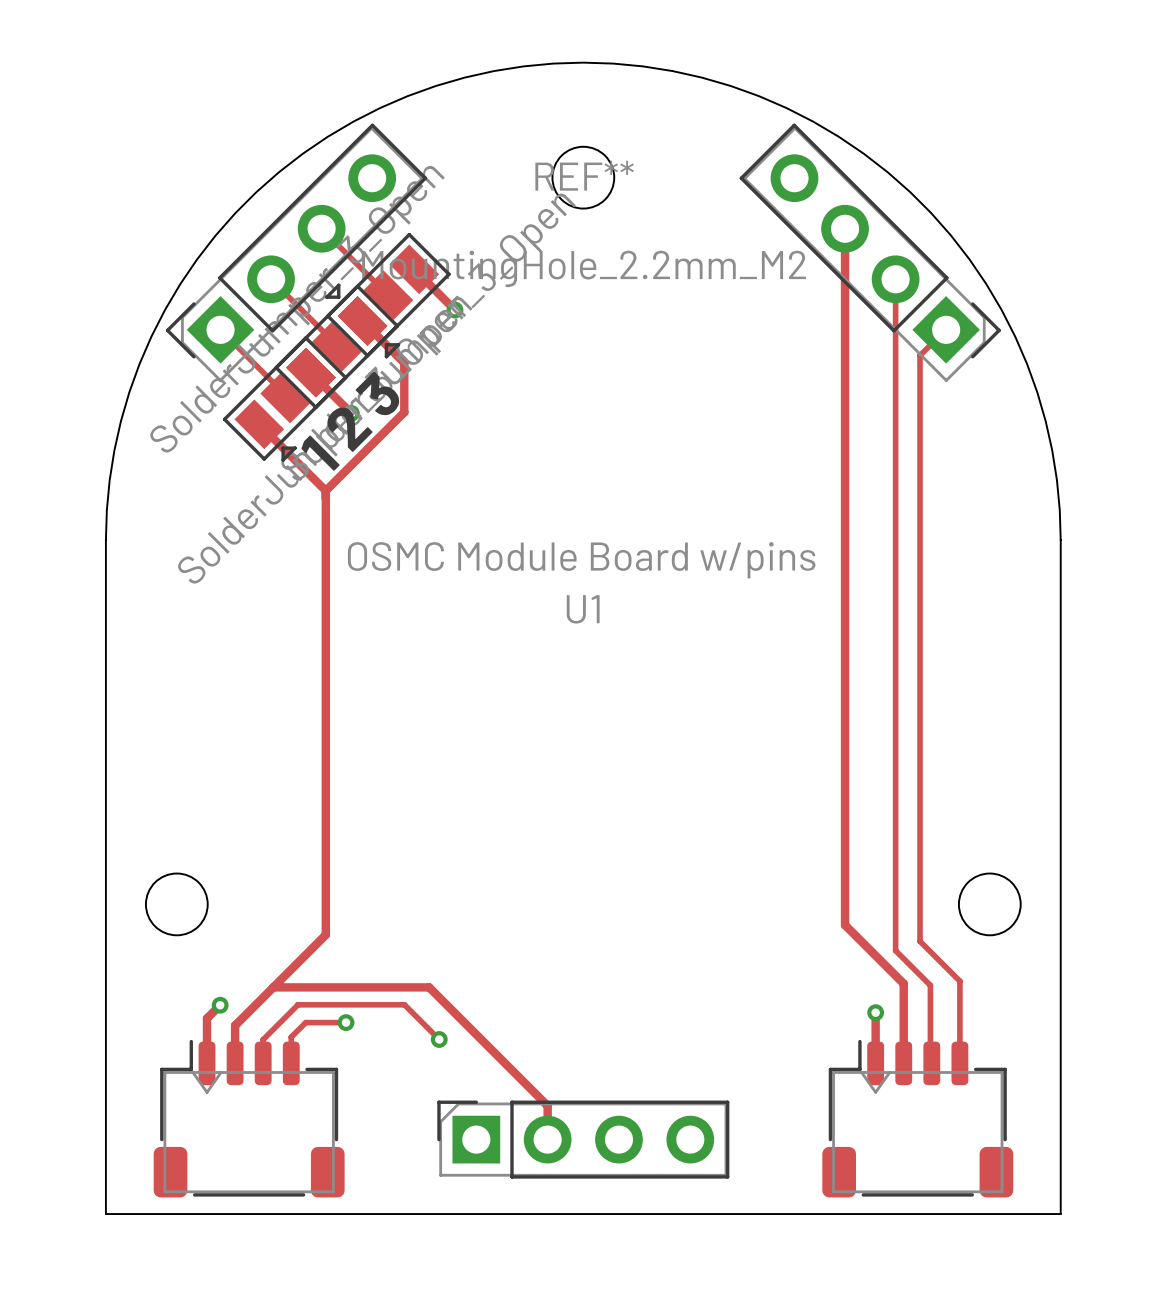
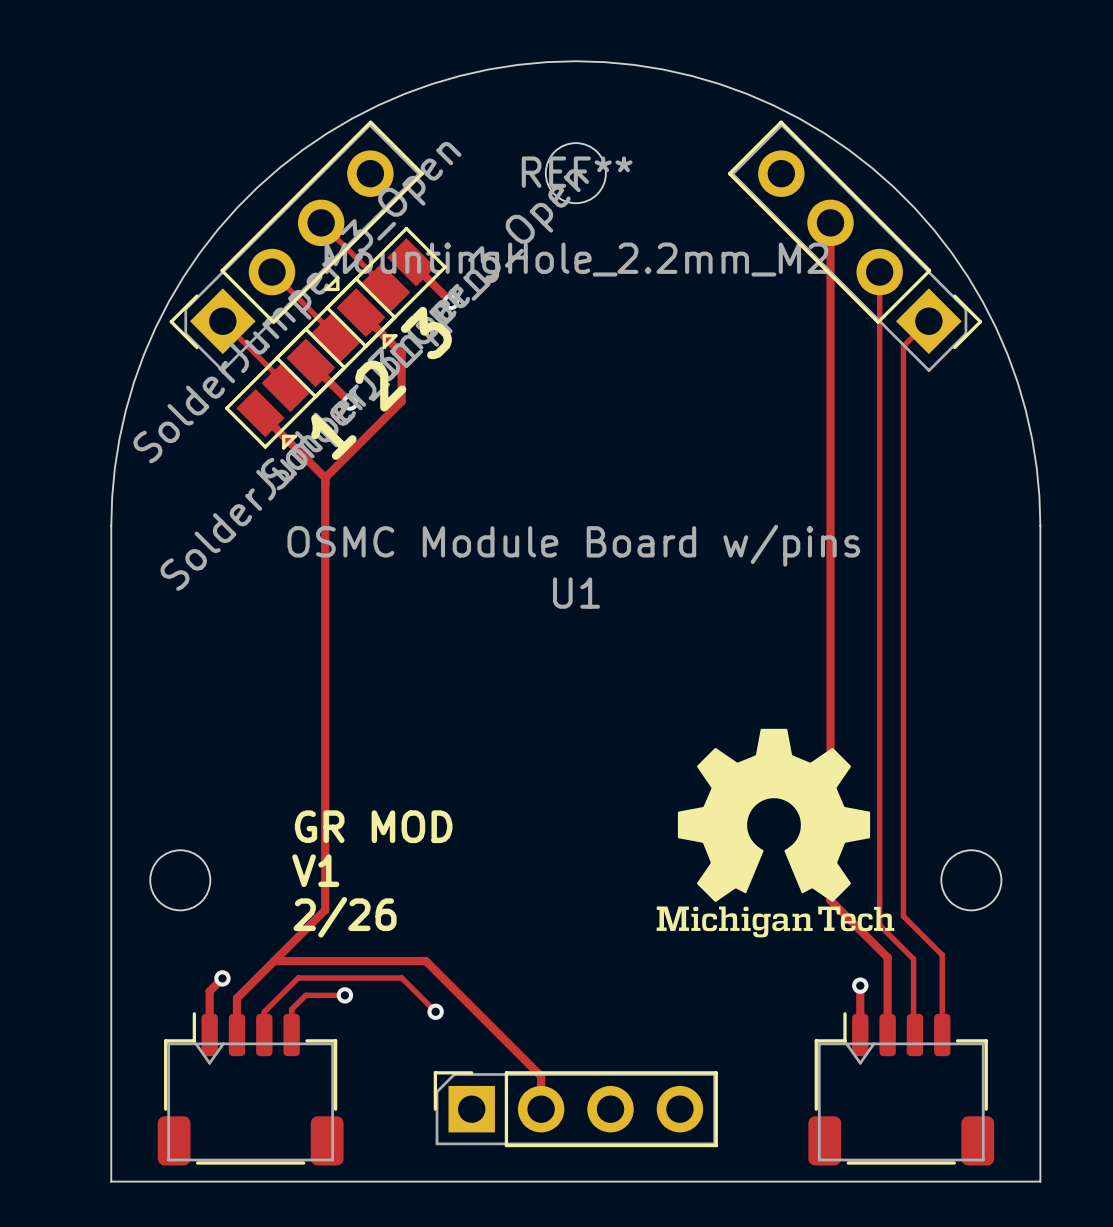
drawing: none -> [656, 728, 895, 938]
text: none -> GR MOD (373, 826)
text: none -> V1 (315, 870)
text: none -> 2/26 (345, 917)

